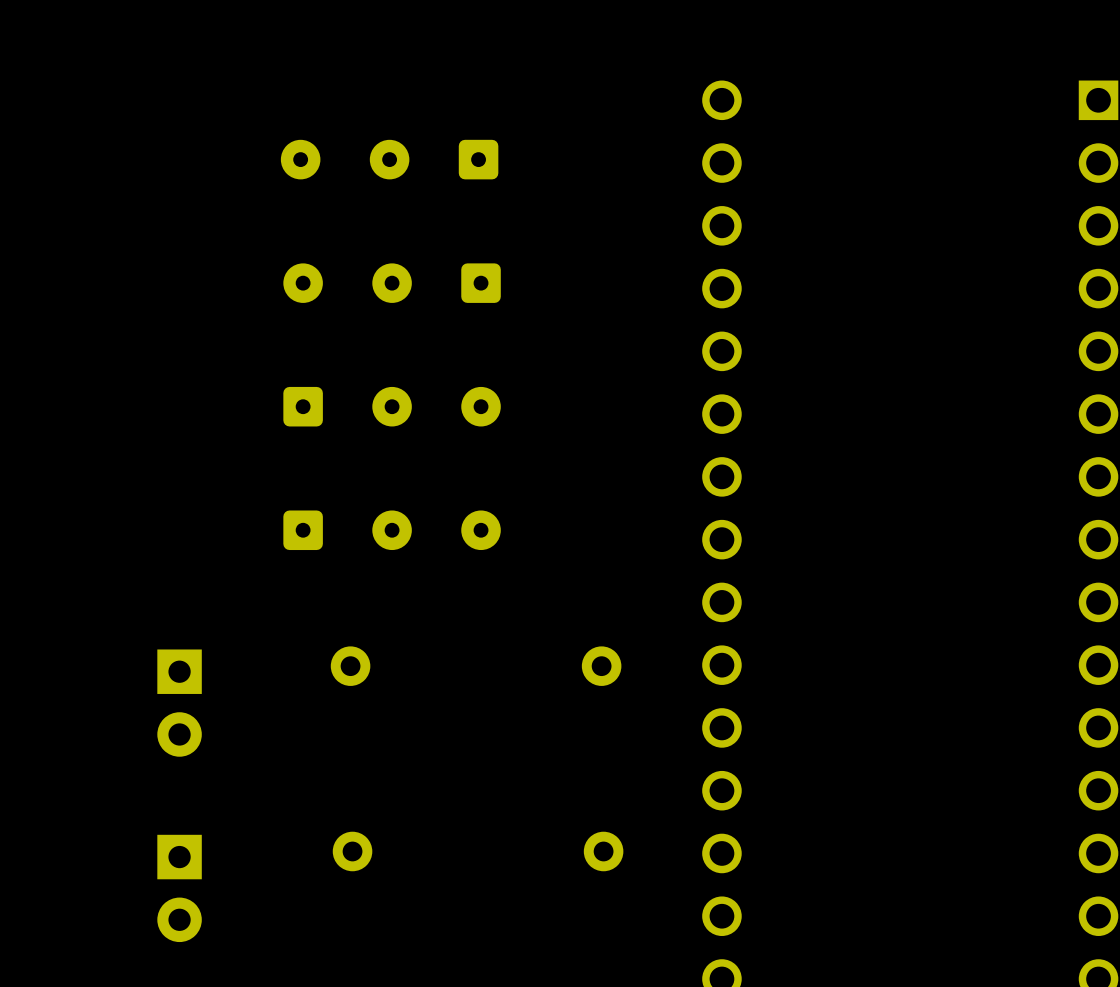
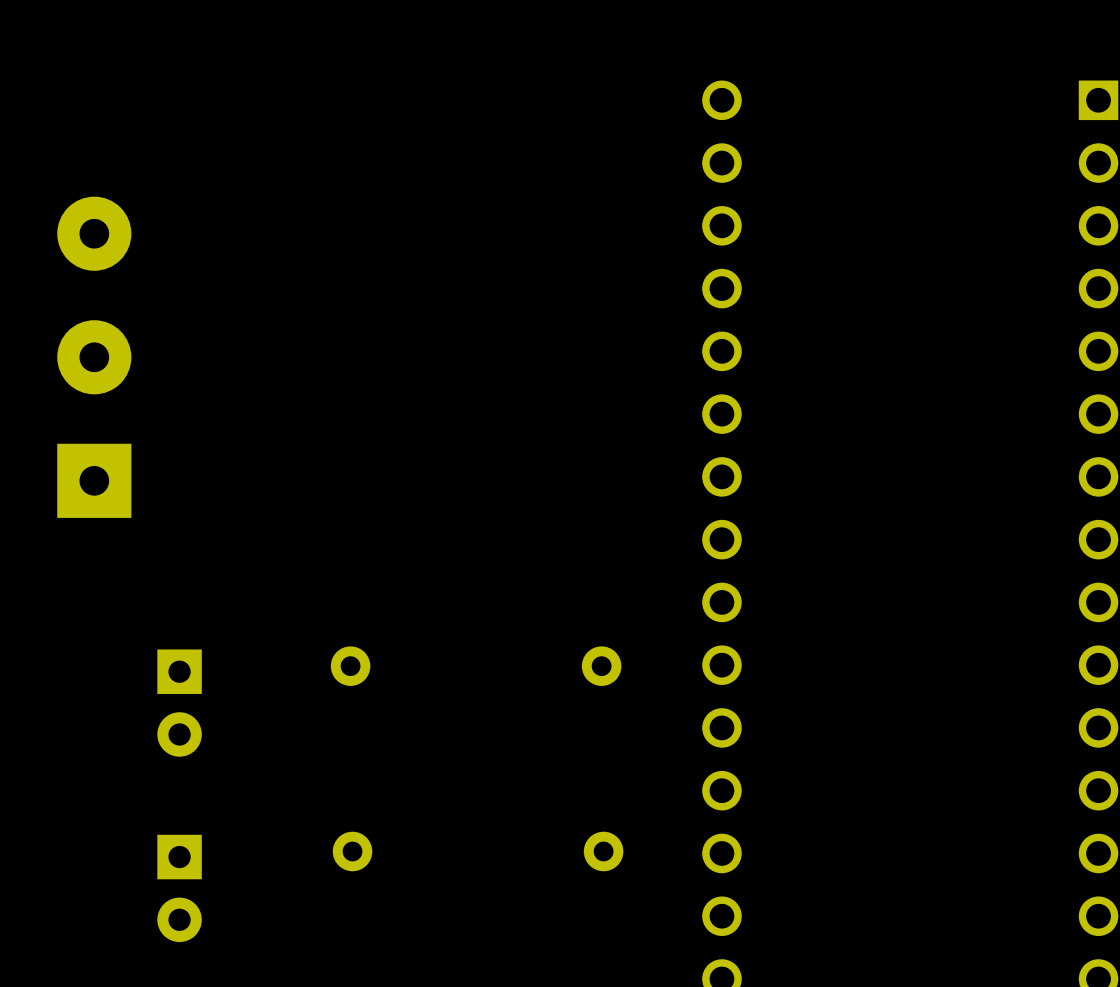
part: (389, 159) -> none
part: (392, 283) -> none
part: none -> (94, 357)
part: (392, 406) -> none
part: (392, 530) -> none

